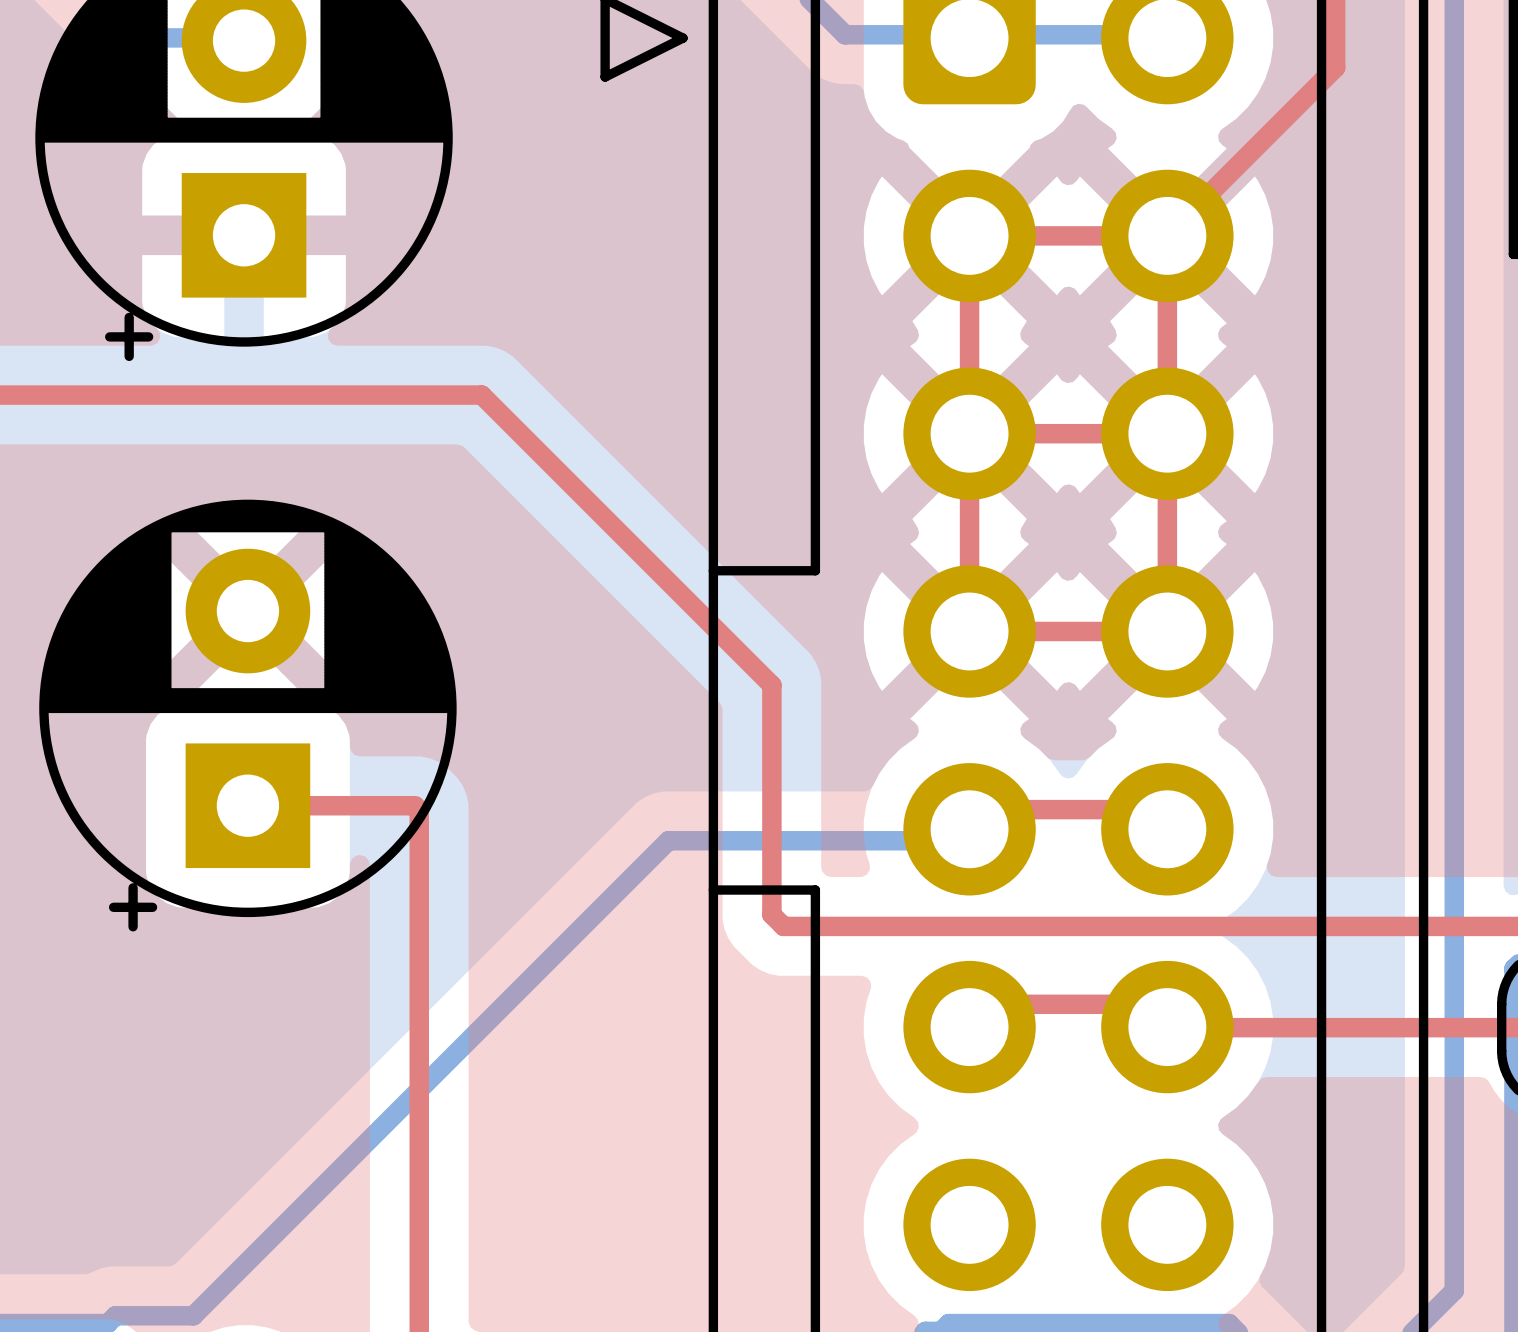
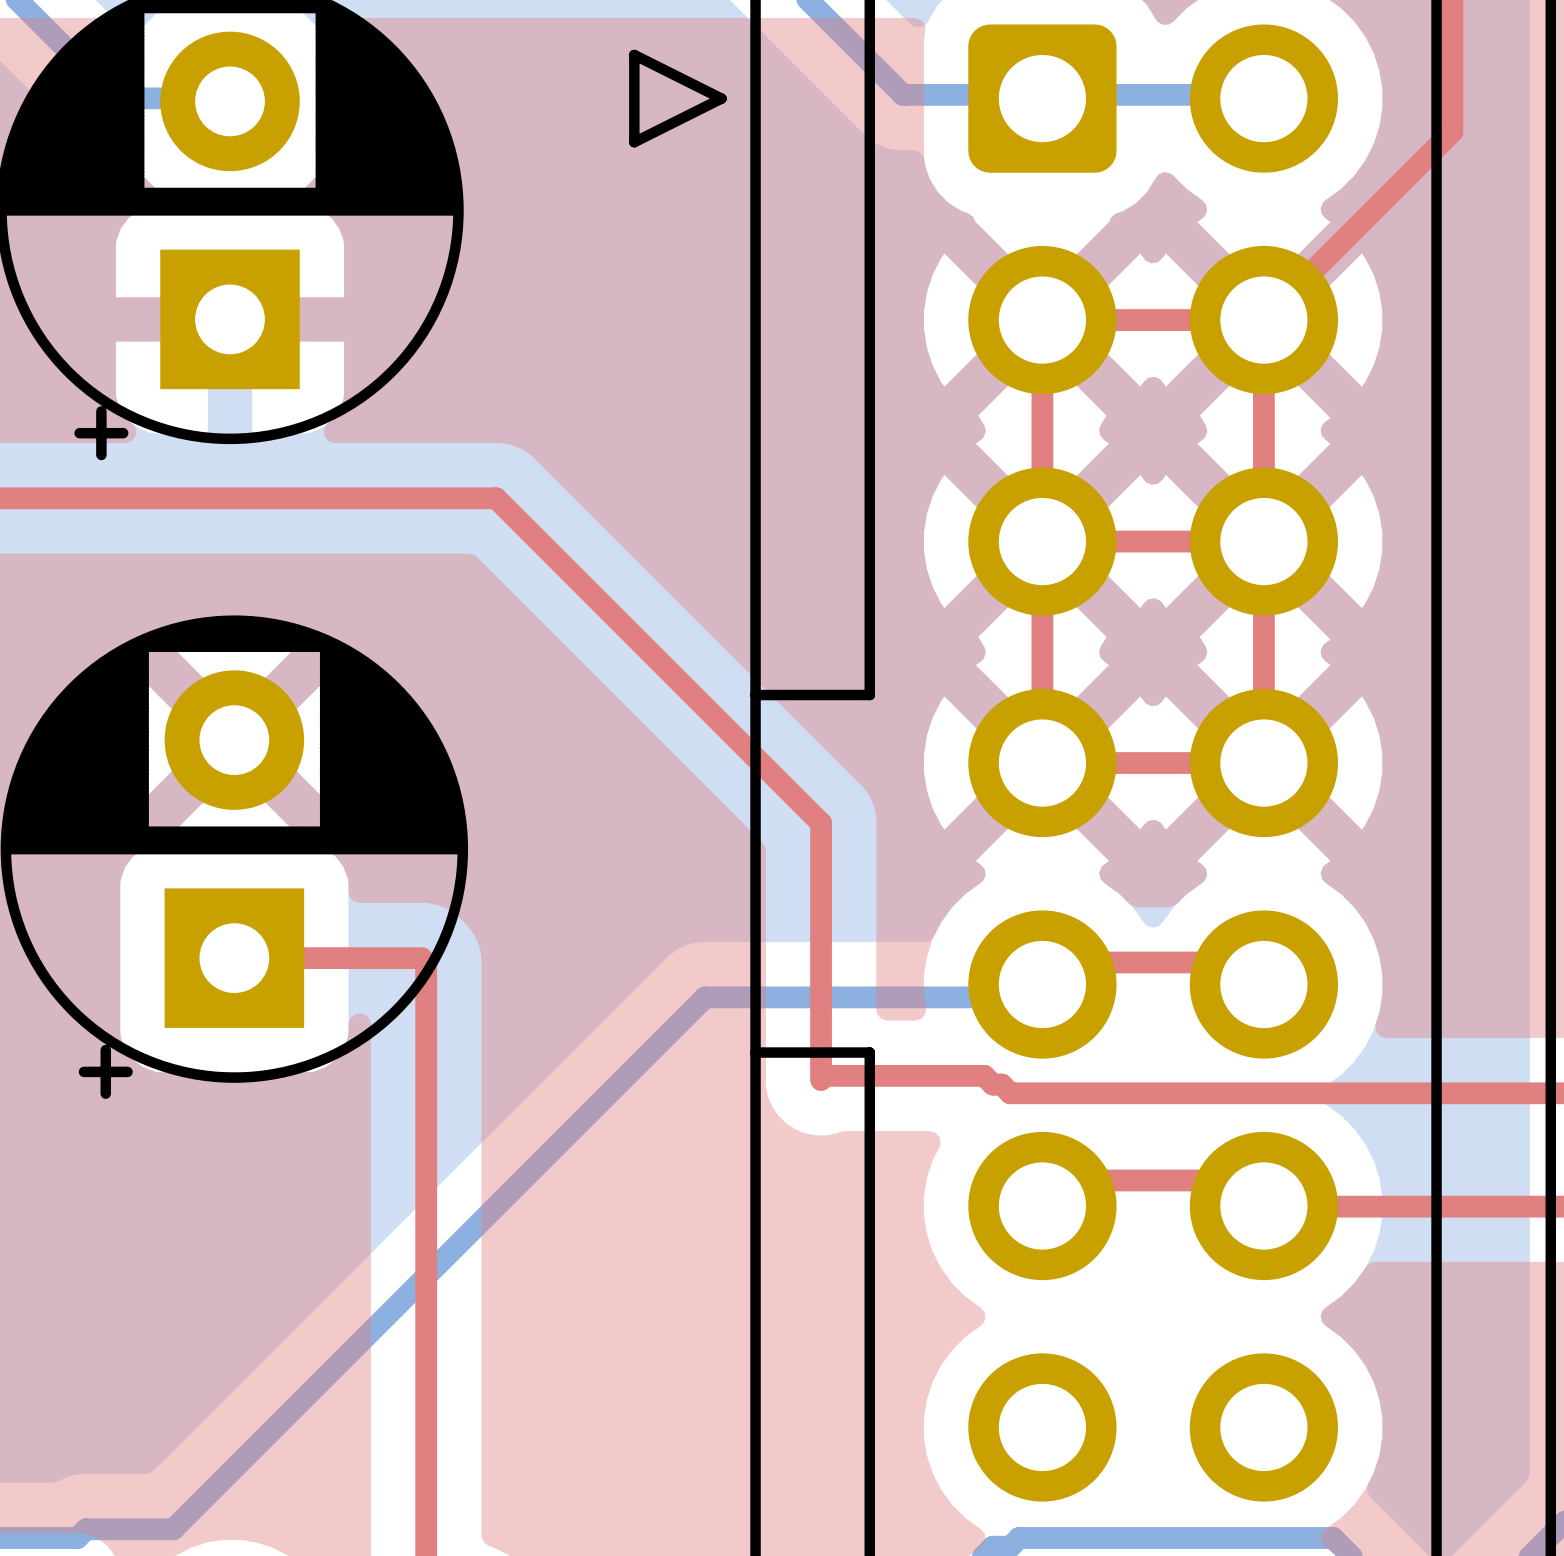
top track: (771, 914) (783, 926) (941, 926) -> (827, 1075) (984, 1075) (992, 1084) (1001, 1084) (1010, 1093)

